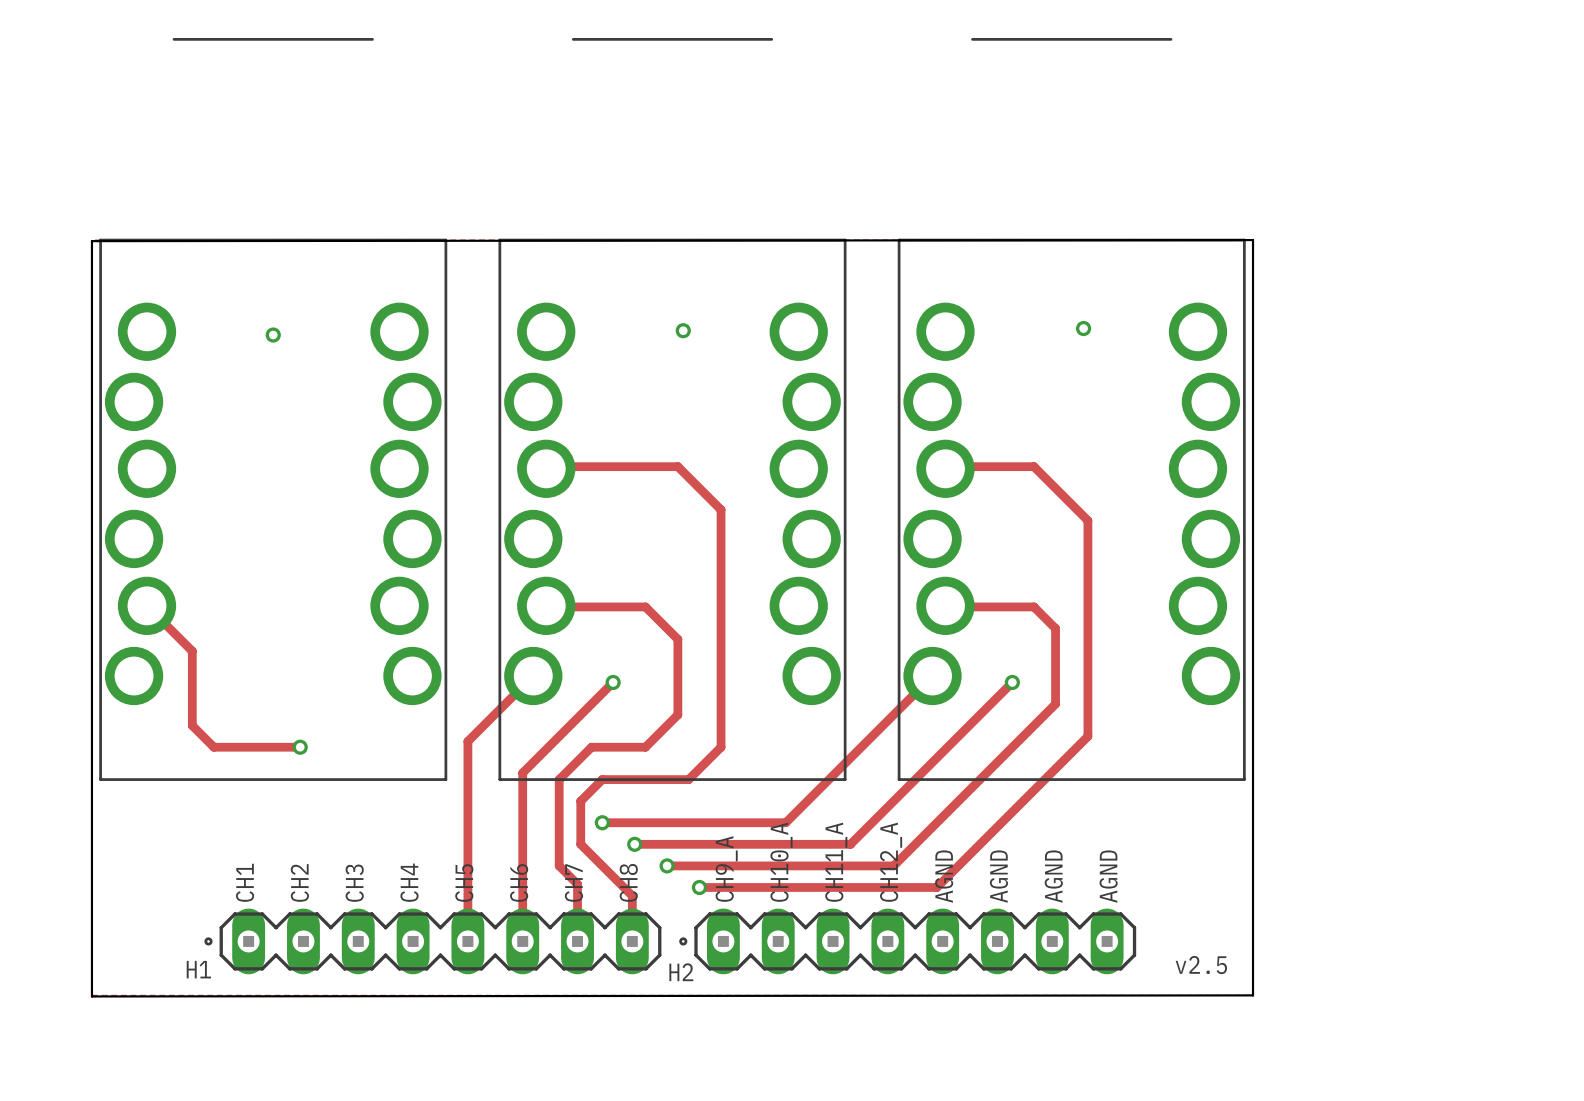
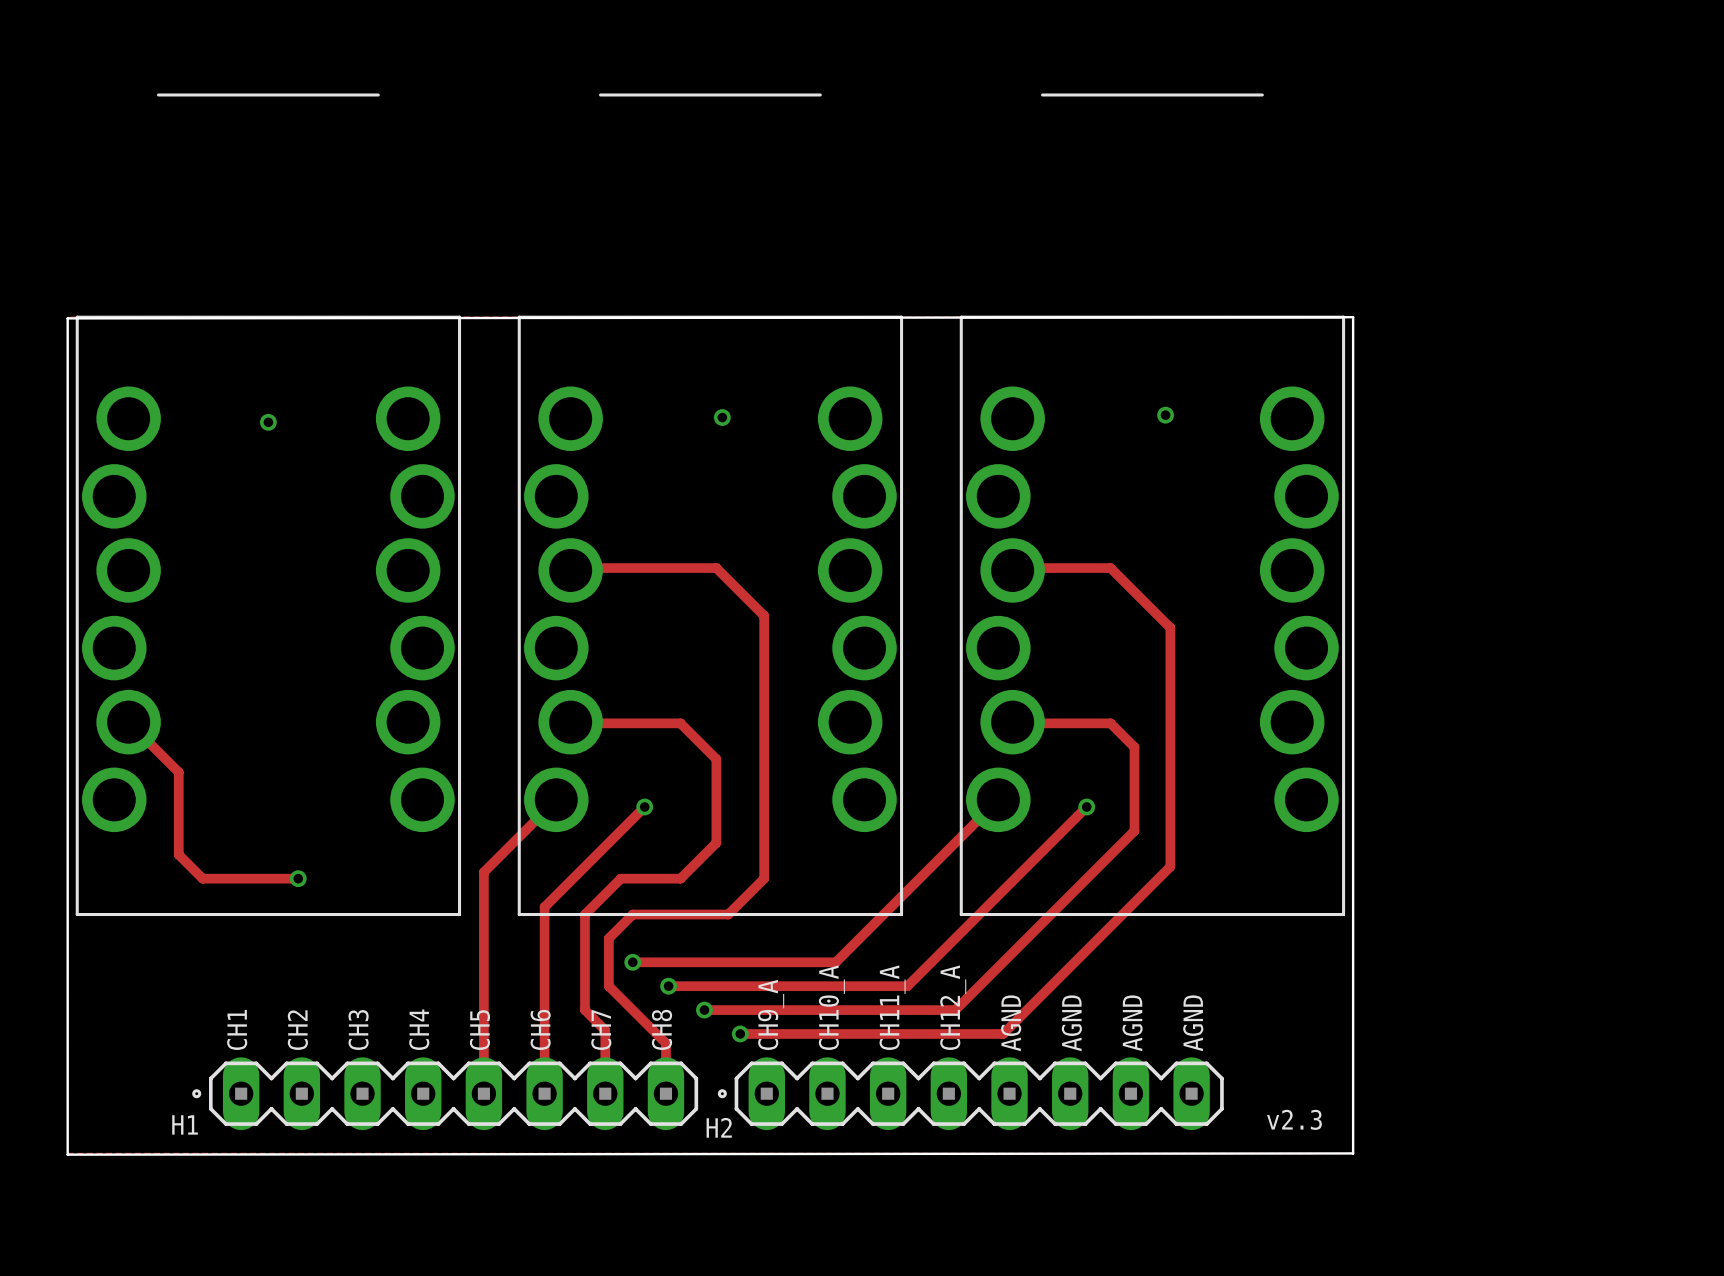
text: v2.5 (1201, 965) -> v2.3 (1294, 1119)

